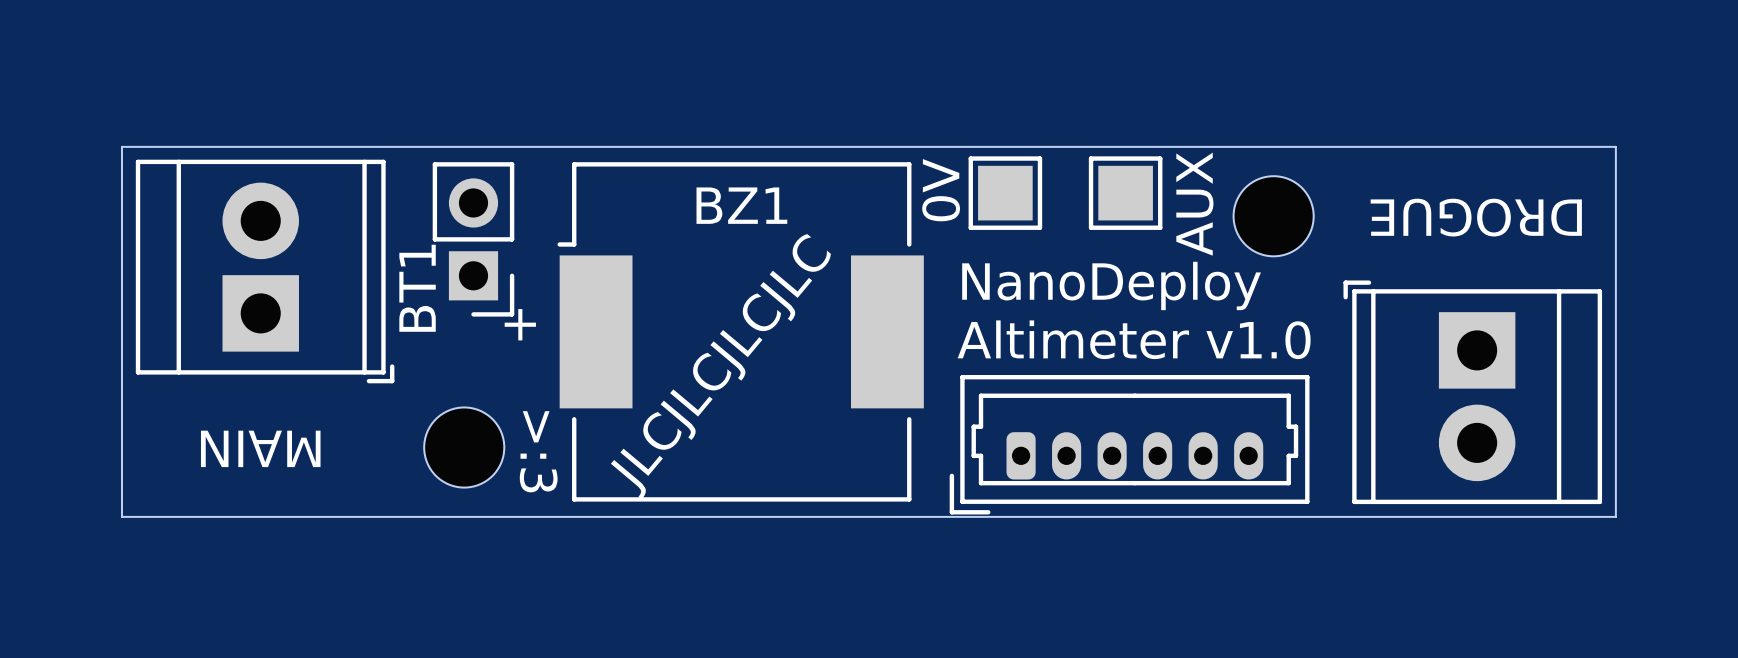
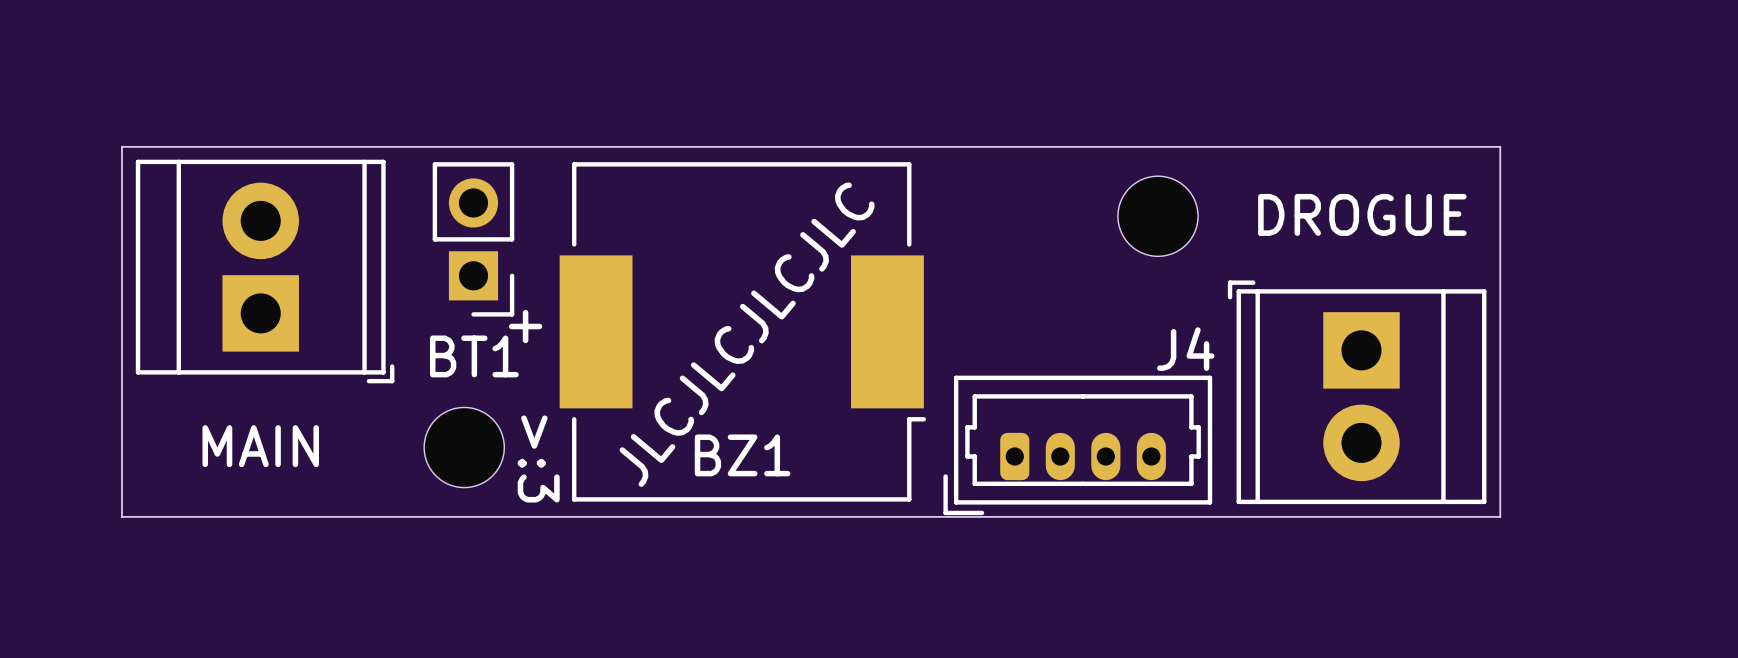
board edge: (1500, 146) (1615, 146) (1615, 516) (1500, 516) -> (1500, 146) (1500, 516)
text: 0V (941, 190) -> none
part: (1005, 193) -> none
part: (1125, 193) -> none
text: AUX (1194, 204) -> none
part position: (1273, 216) -> (1158, 216)
text rotation: 0° (1476, 217) -> 180° (1362, 214)
text: NanoDeploy (1111, 285) -> none
BT1 name rotation: 0° (417, 288) -> 90° clockwise (474, 356)
BZ1 rotation: 0° (740, 331) -> 180° (742, 331)
text: Altimeter v1.0 (1134, 339) -> none
part position: (1472, 392) -> (1357, 392)
part: (1129, 444) -> none
J4: none -> (1077, 445)
text rotation: 0° (260, 448) -> 180° (260, 446)

